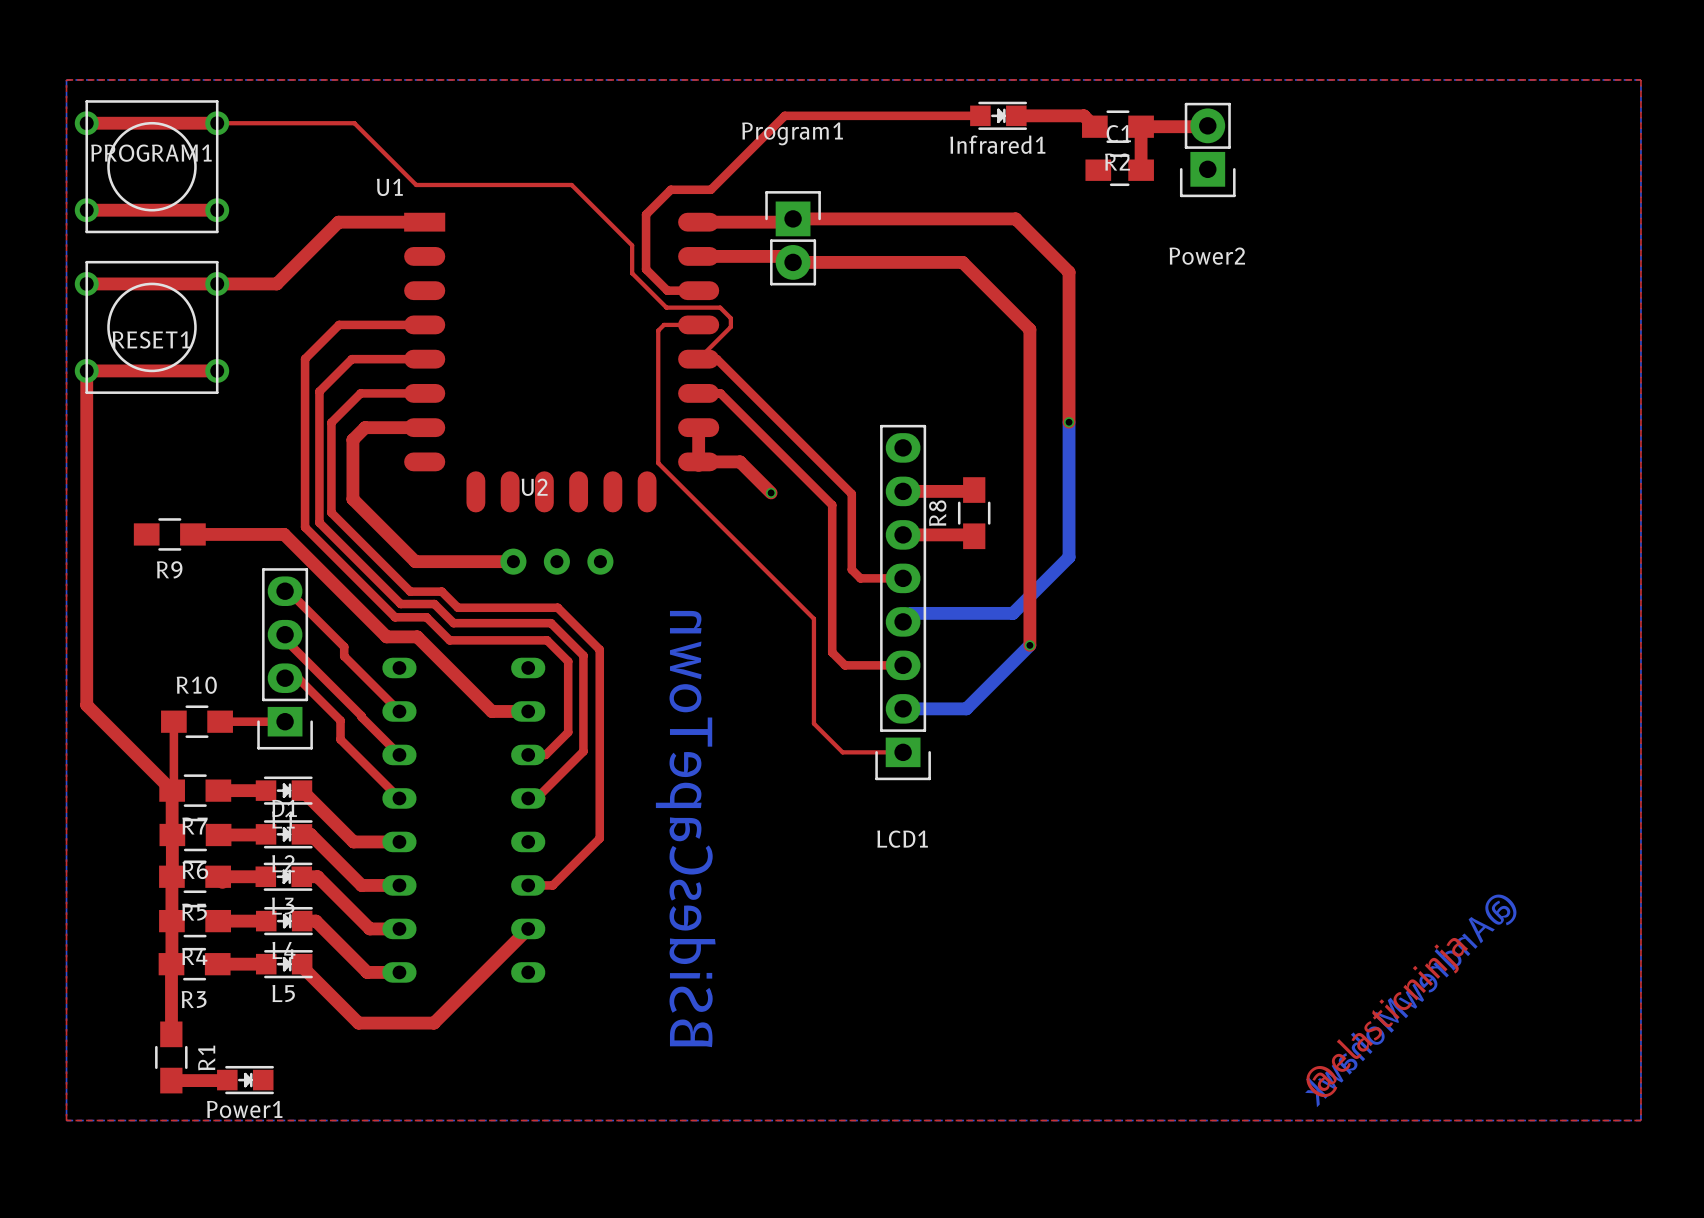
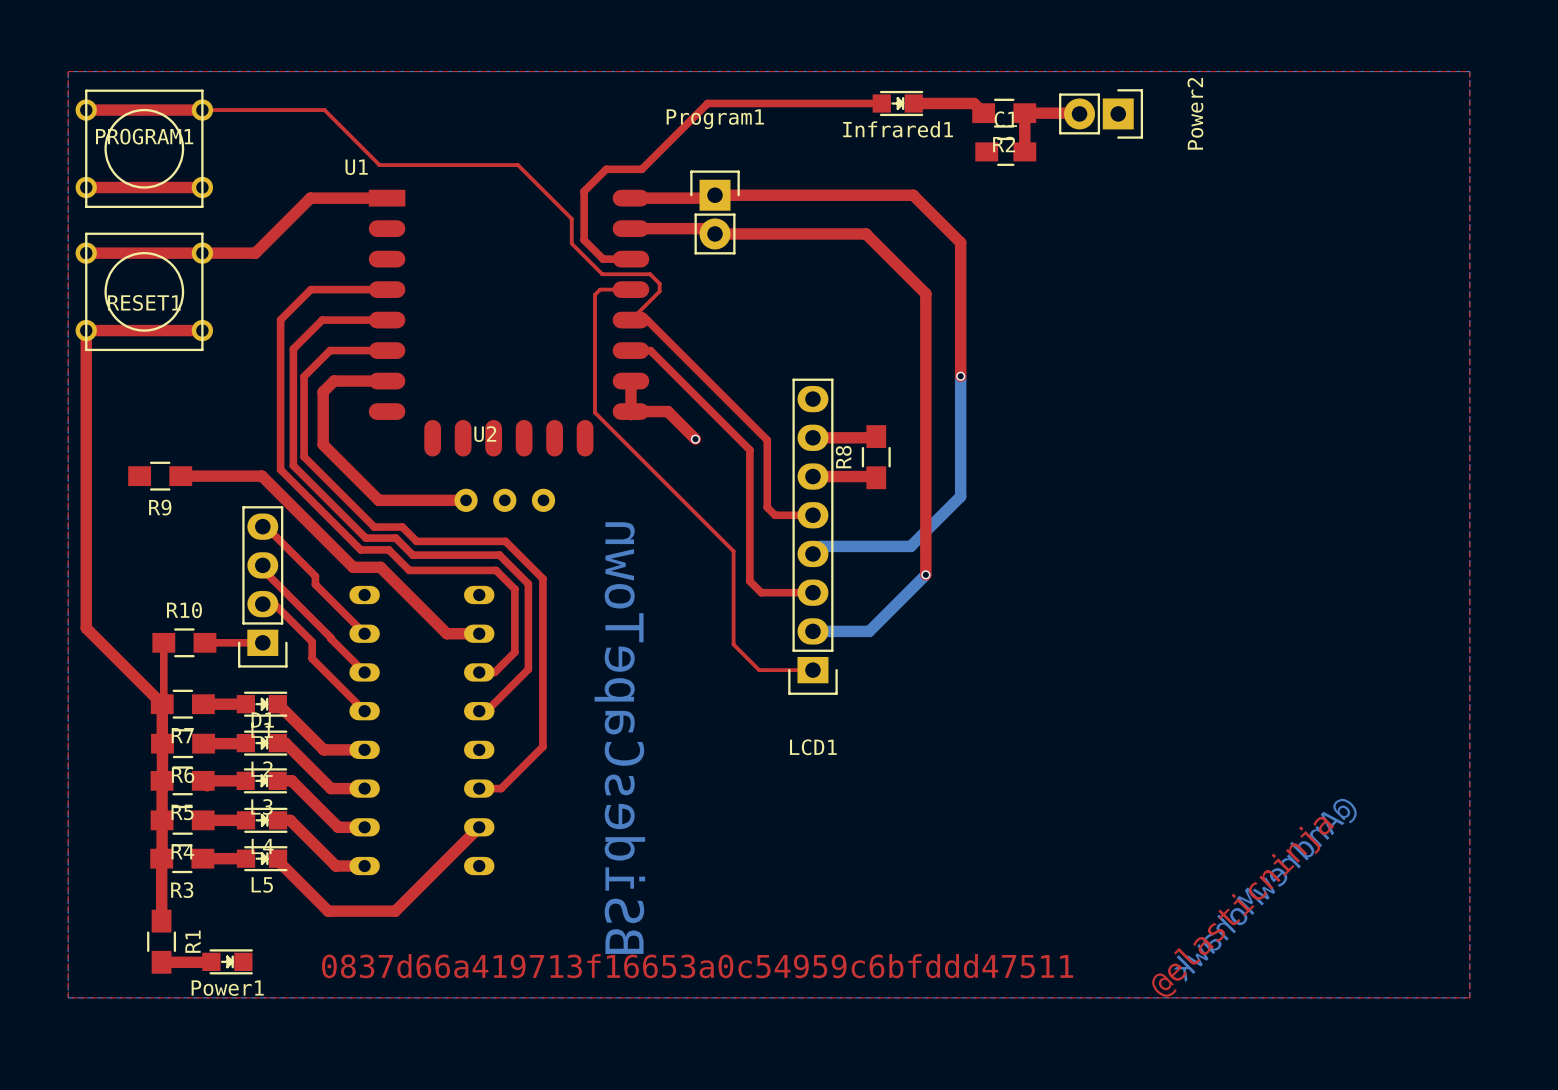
Power2 rotation: 0° (1207, 149) -> 90° counterclockwise (1101, 113)
text: none -> 0837d66a419713f16653a0c54959c6bfddd47511 (697, 966)

